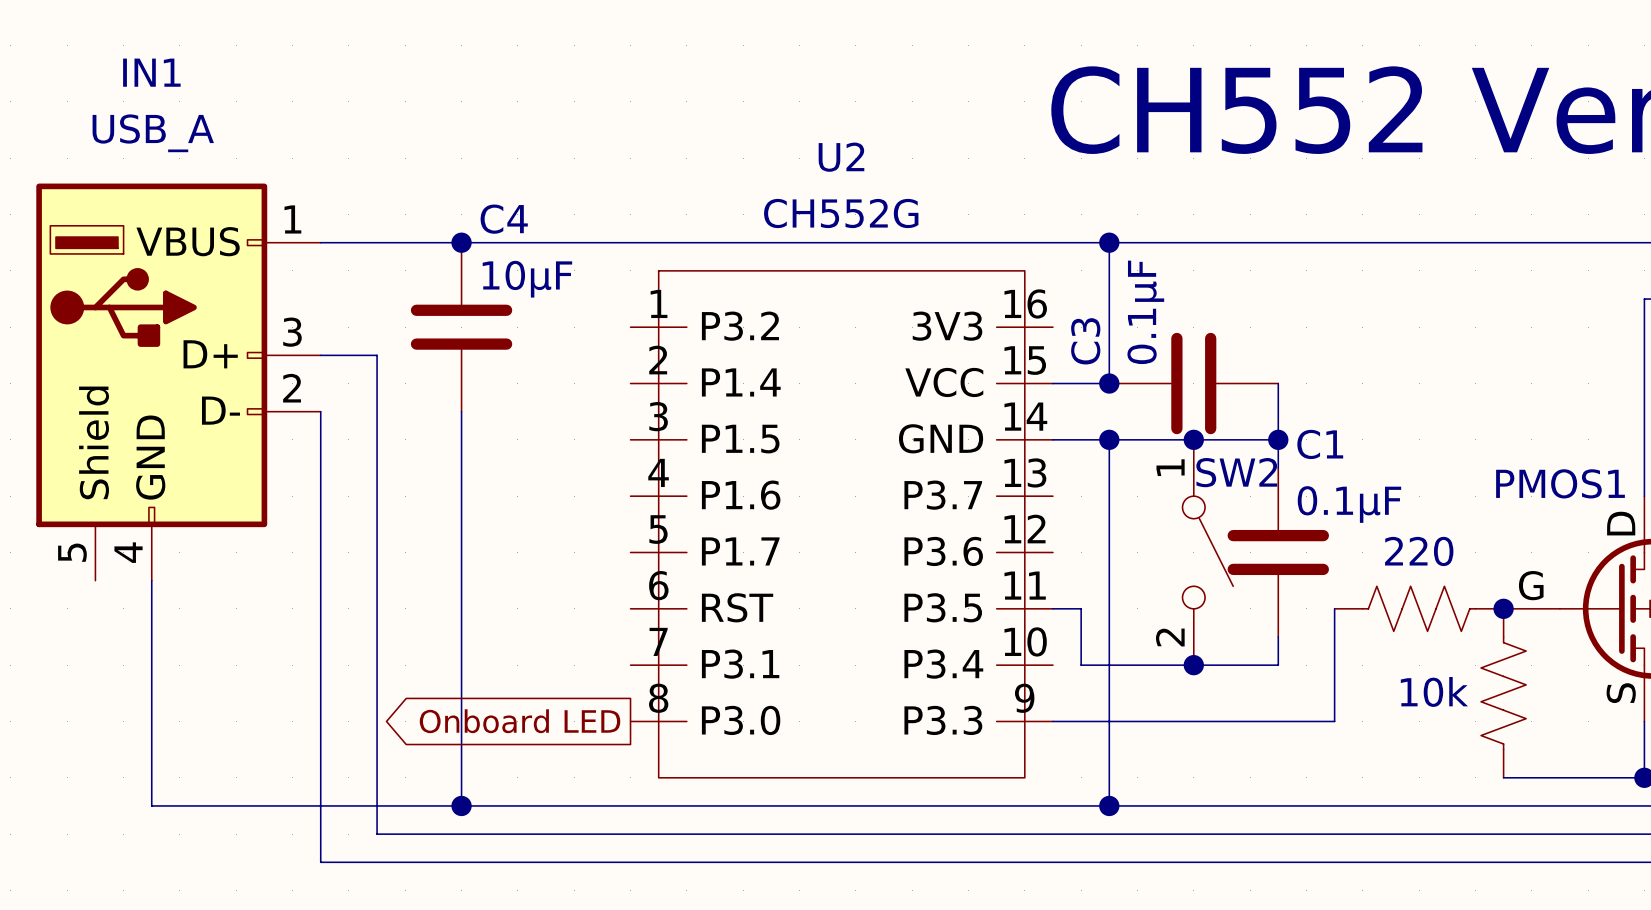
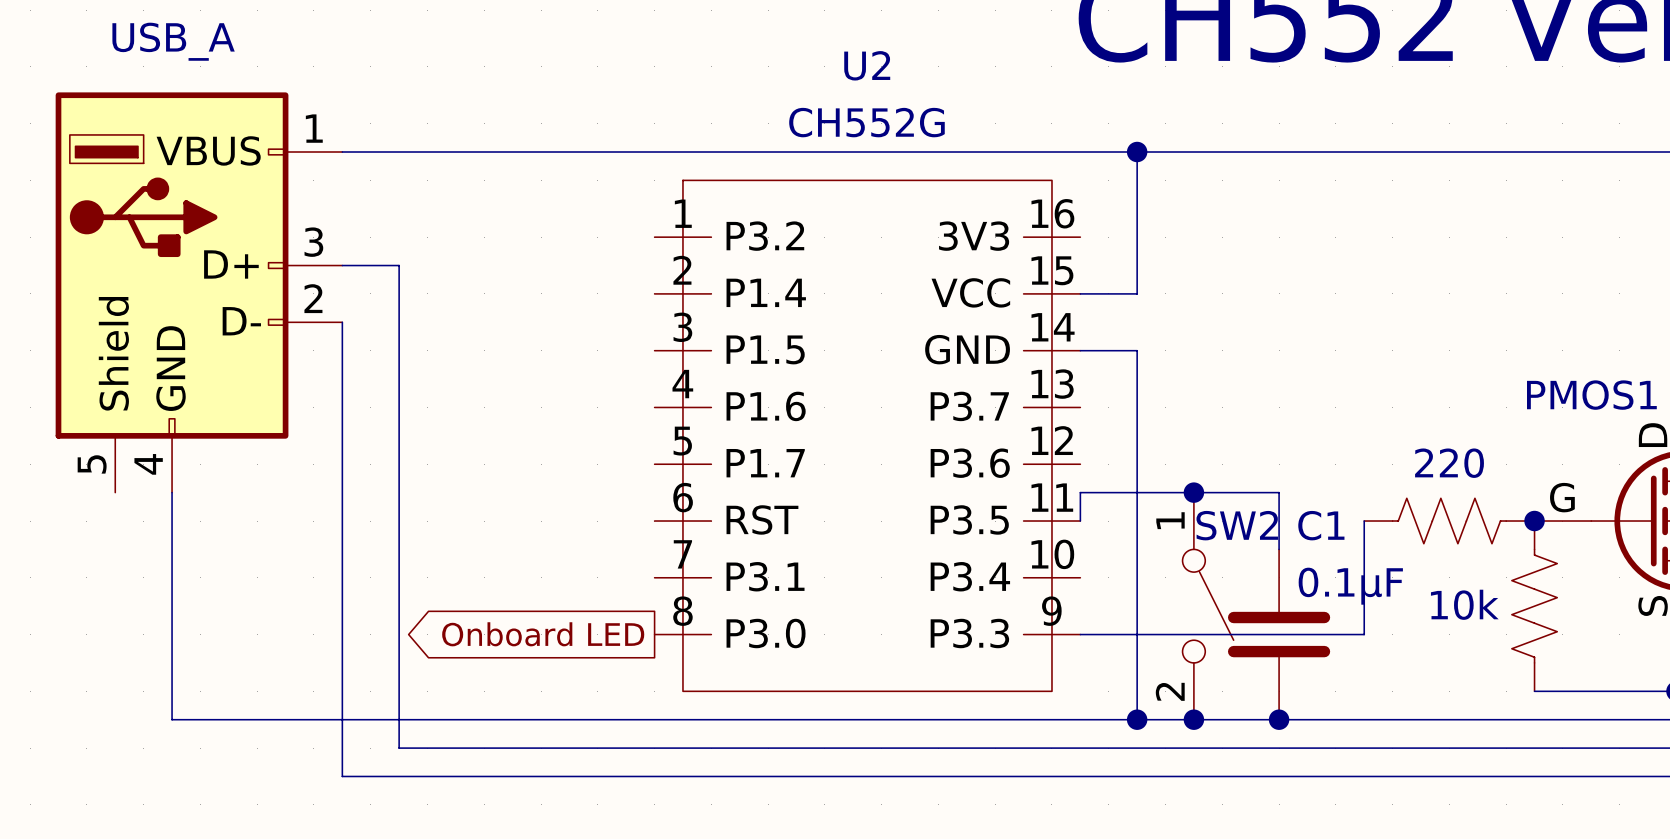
junction: (461, 242) -> none
C4: 10μF (461, 327) -> none
junction: (1109, 383) -> none
C3: 0.1μF (1193, 383) -> none
wire: (1278, 383) (1278, 468) -> none
wire: (461, 411) (461, 805) -> none
wire: (1109, 439) (1278, 439) -> none
junction: (1109, 439) -> none
junction: (1193, 439) -> none
junction: (1278, 439) -> none
SW2 position: (1207, 552) -> (1208, 606)
C1 position: (1278, 552) -> (1279, 634)
junction: none -> (1193, 492)
wire: (1052, 608) (1081, 608) (1081, 665) (1278, 665) (1278, 636) -> (1080, 521) (1080, 492) (1279, 492) (1279, 549)
junction: (1193, 665) -> none
junction: (461, 805) -> none
junction: none -> (1193, 719)
junction: none -> (1279, 719)

